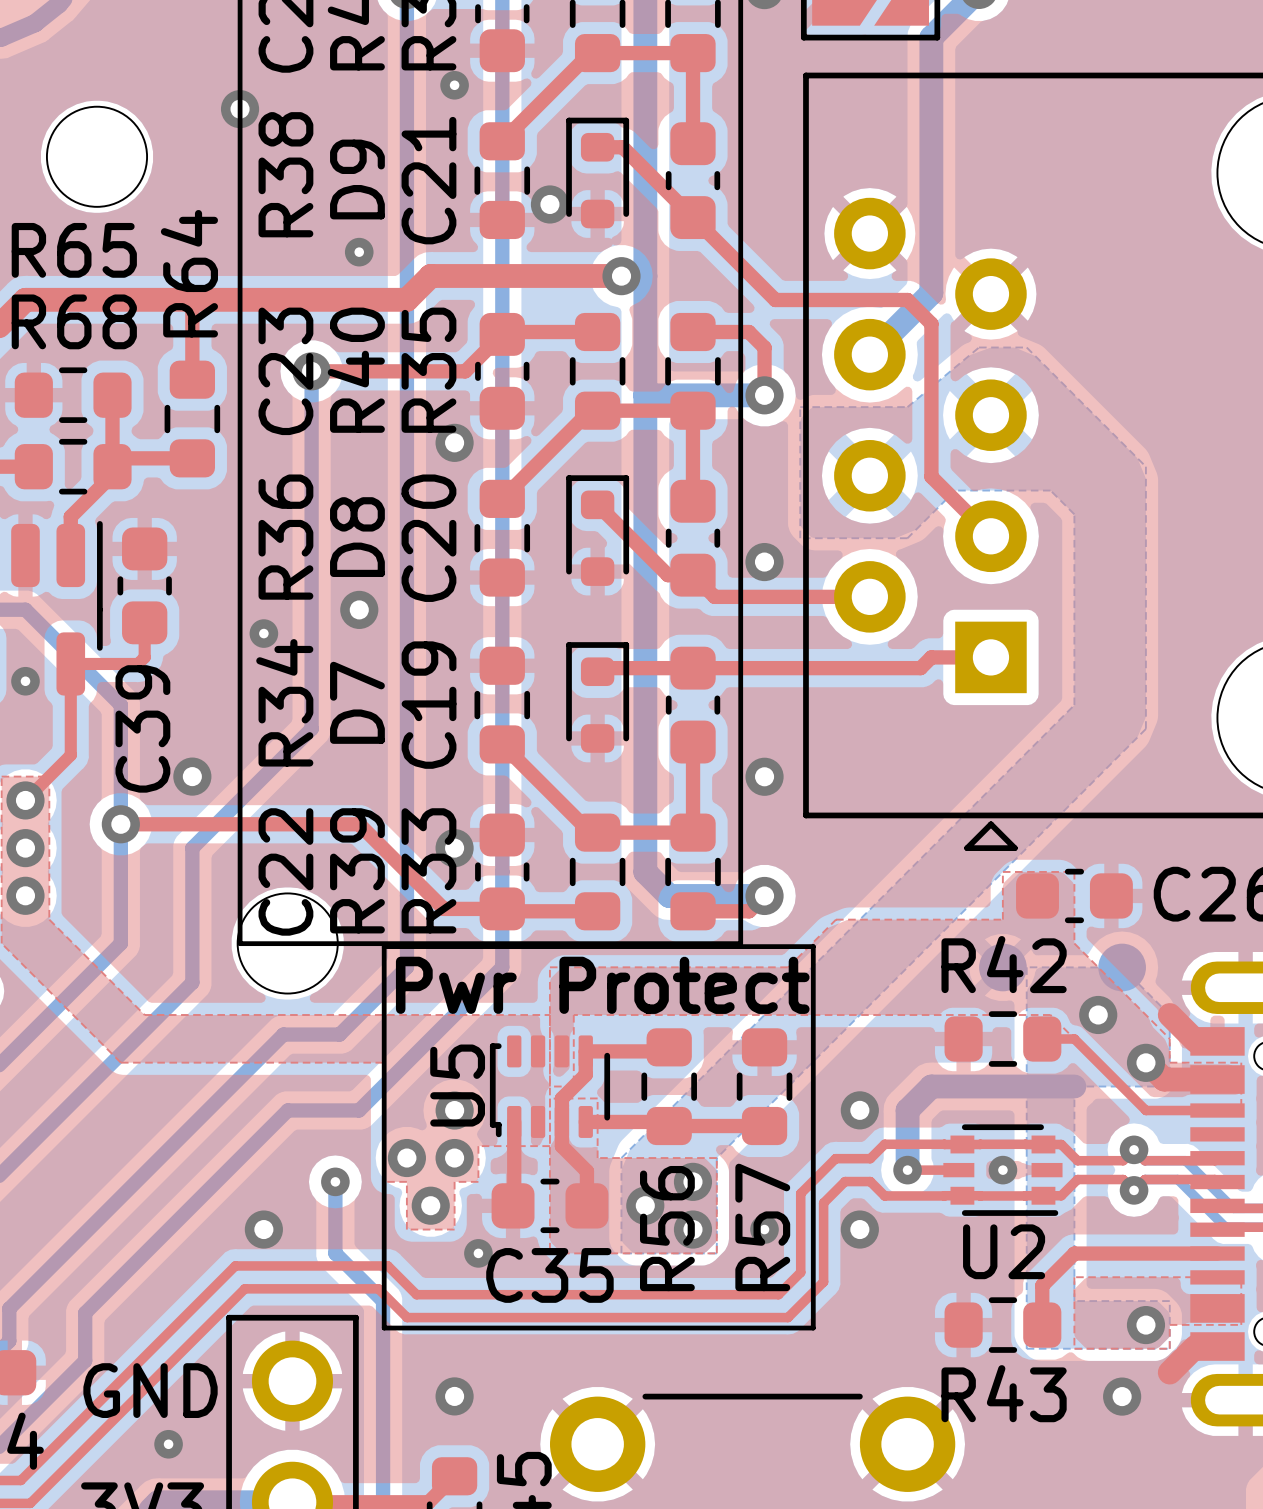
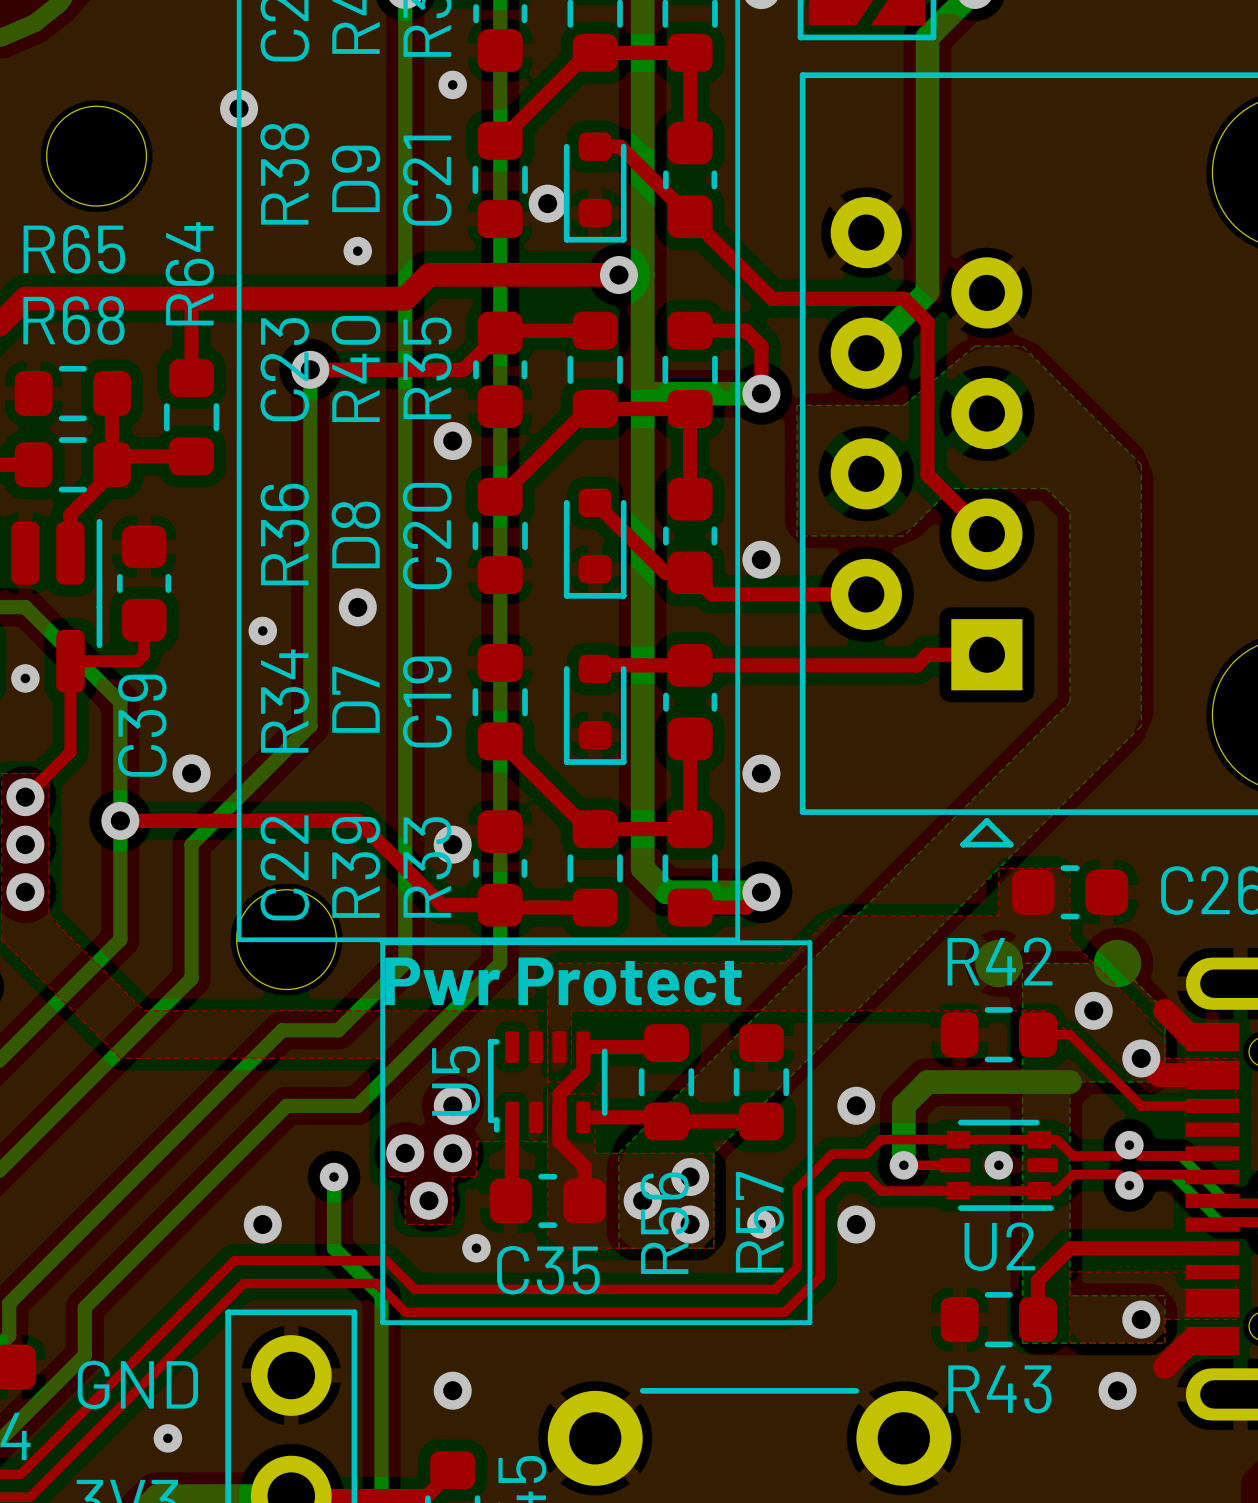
D9 rotation: 0° (597, 173) -> 180° (595, 187)
D8 rotation: 0° (597, 530) -> 180° (595, 543)
D7 rotation: 0° (597, 697) -> 180° (595, 709)

